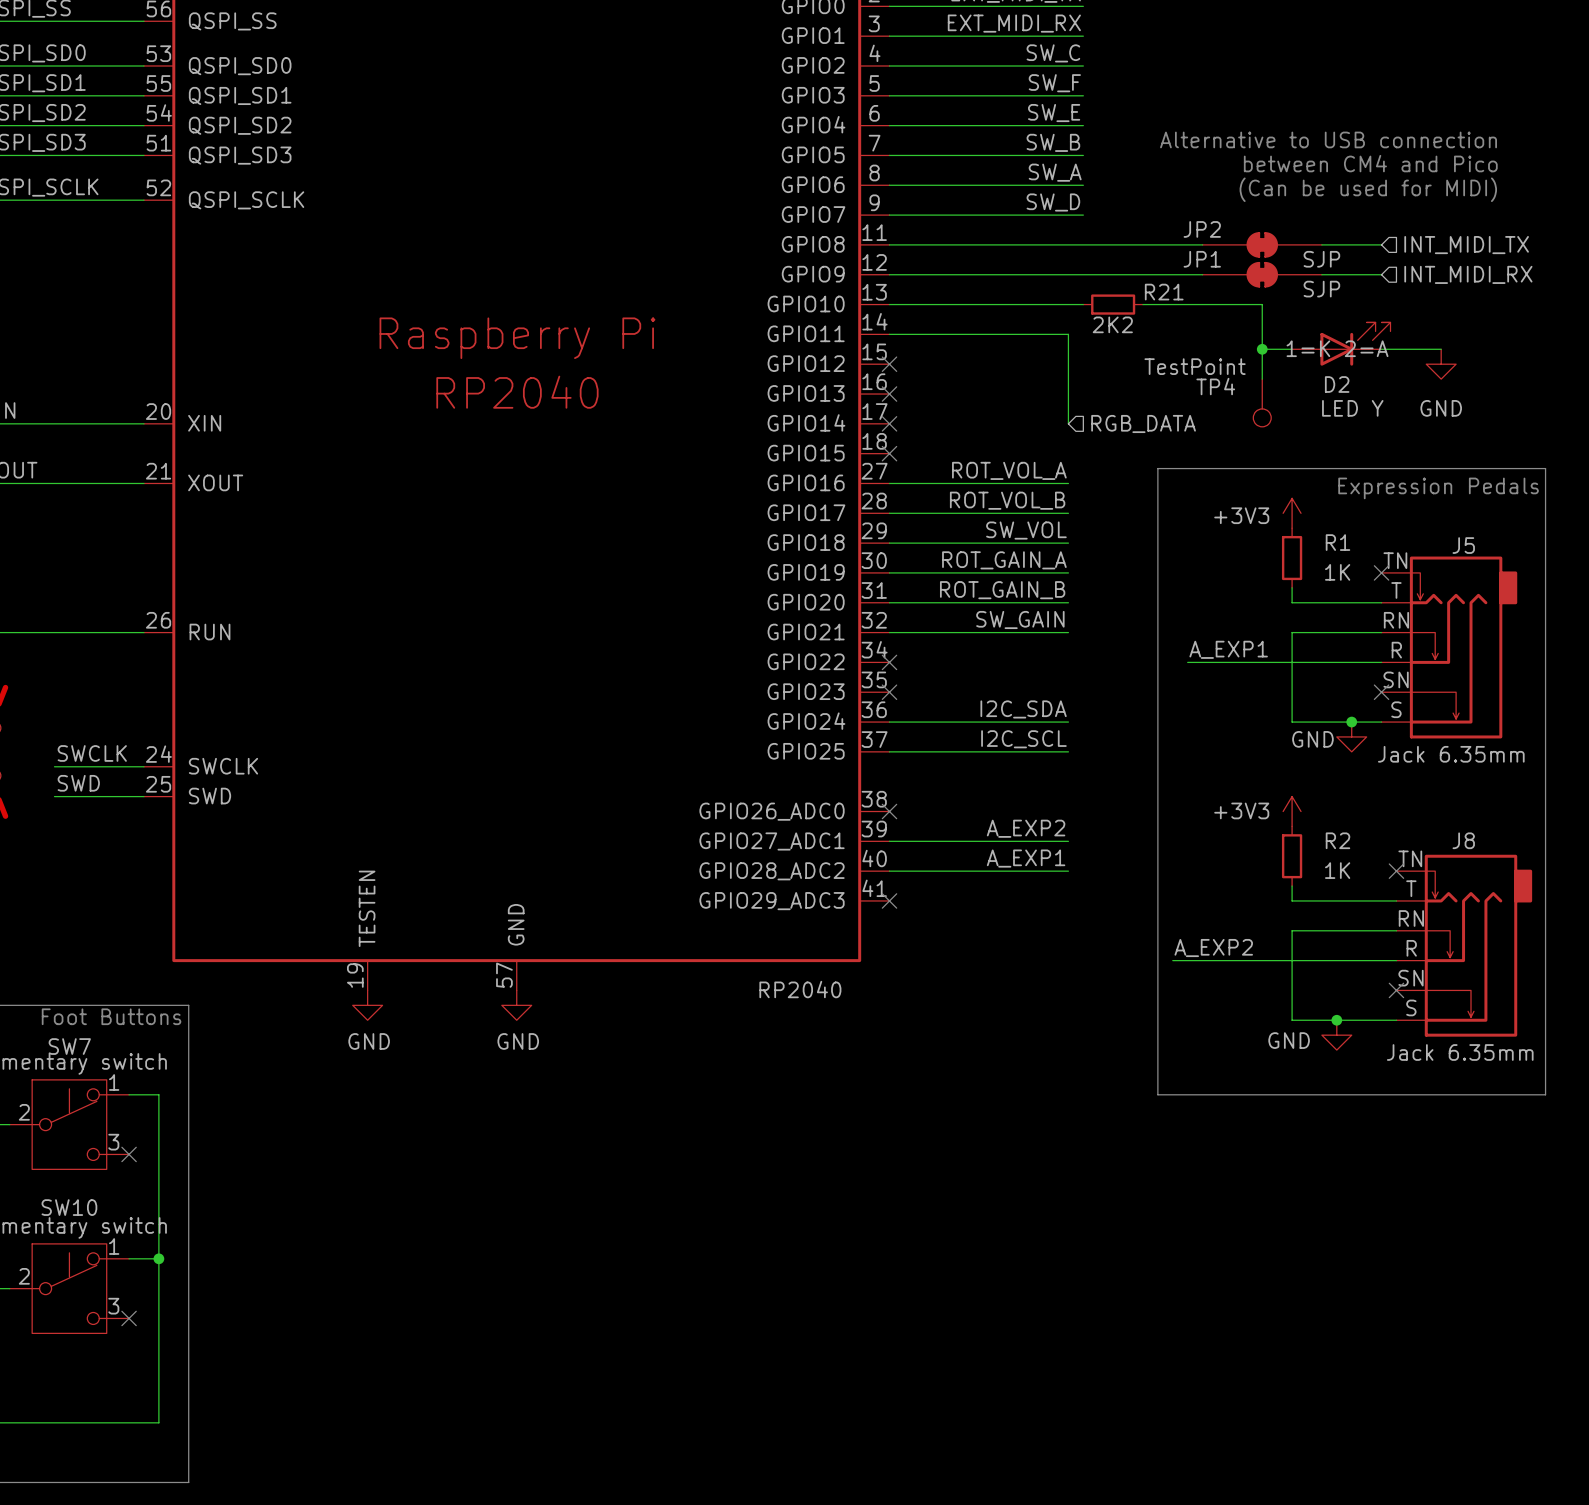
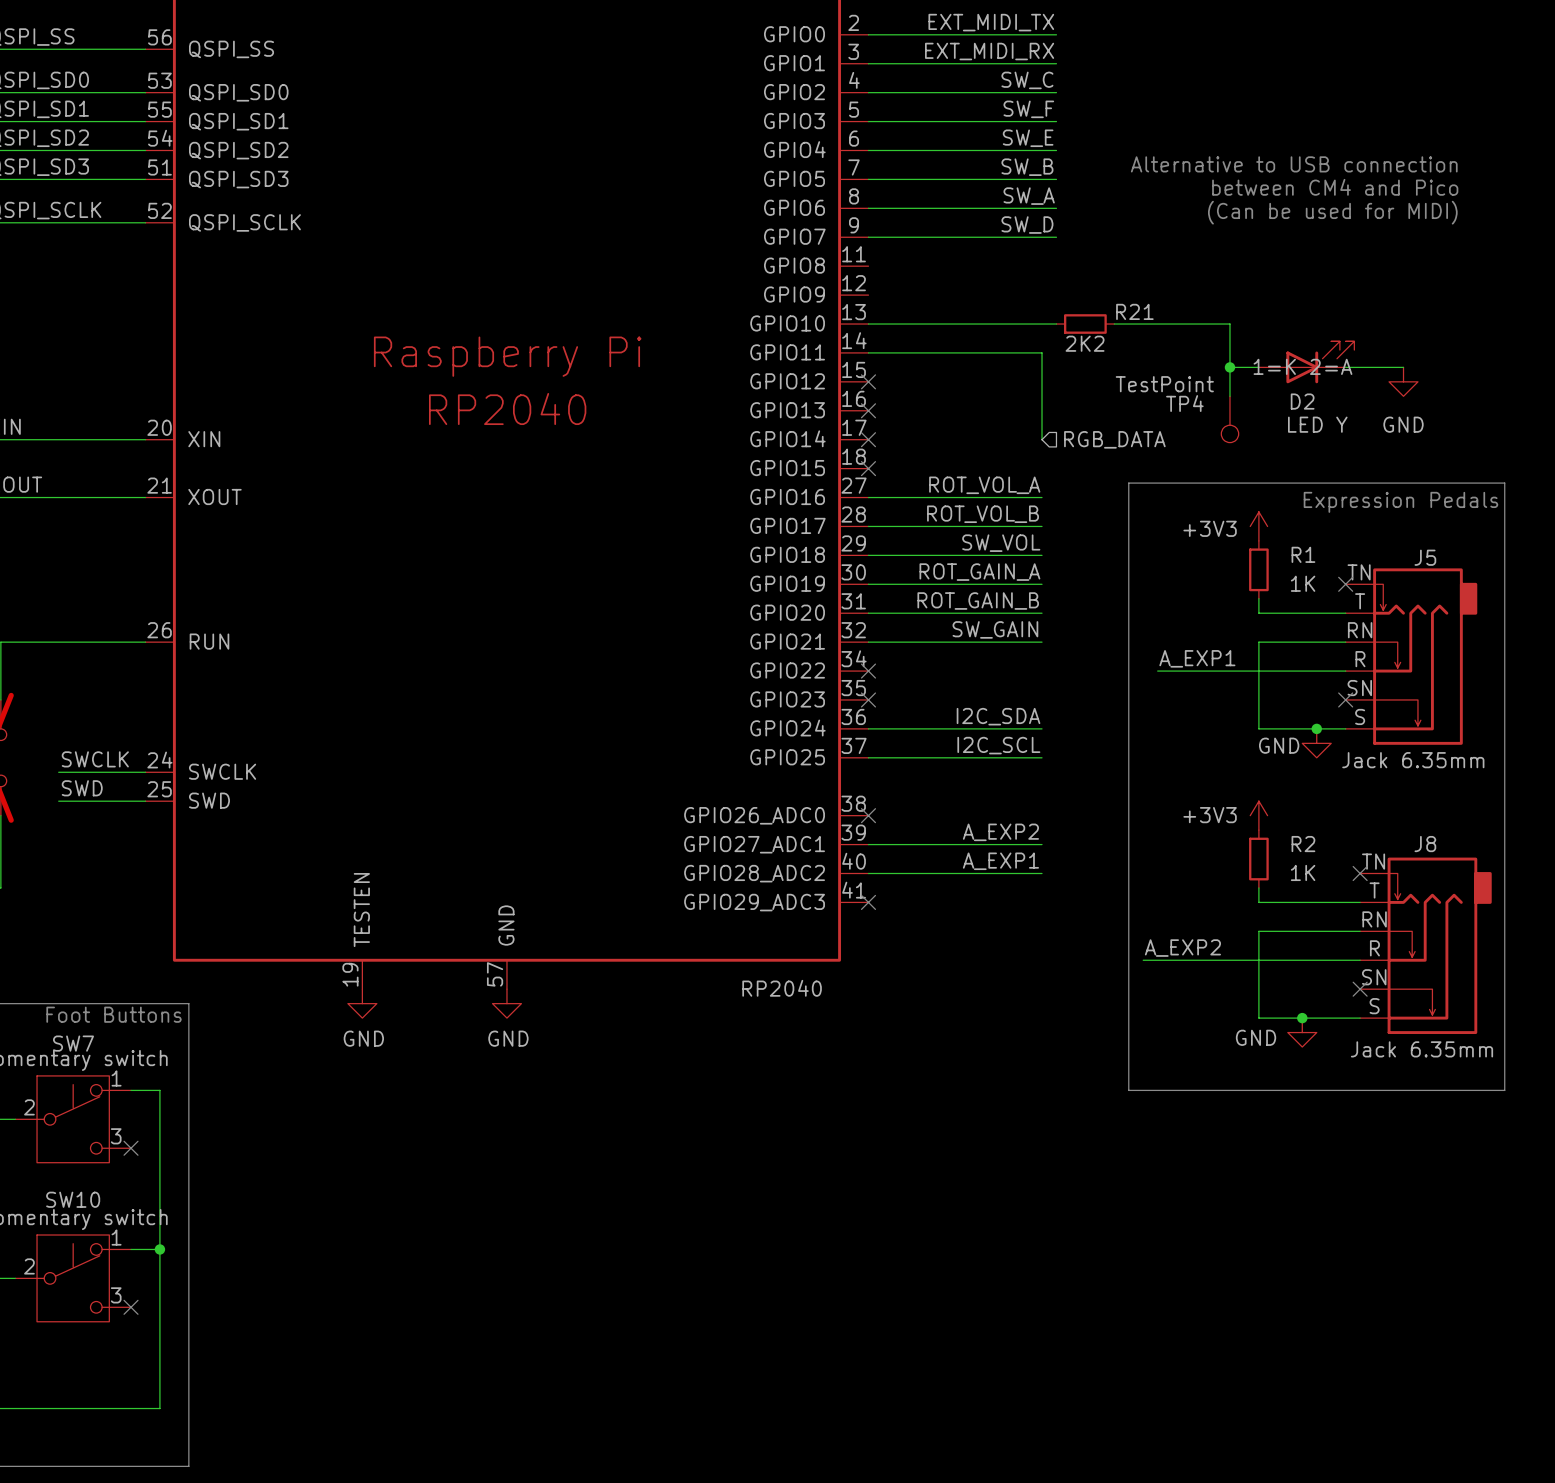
wire: (889, 244) (1202, 244) -> none
JP2: SJP (1262, 244) -> none
wire: (1321, 244) (1381, 244) -> none
hierarchical label: INT_MIDI_TX (1466, 245) -> none
wire: (889, 274) (1202, 274) -> none
JP1: SJP (1262, 274) -> none
wire: (1321, 274) (1381, 274) -> none
hierarchical label: INT_MIDI_RX (1468, 274) -> none

